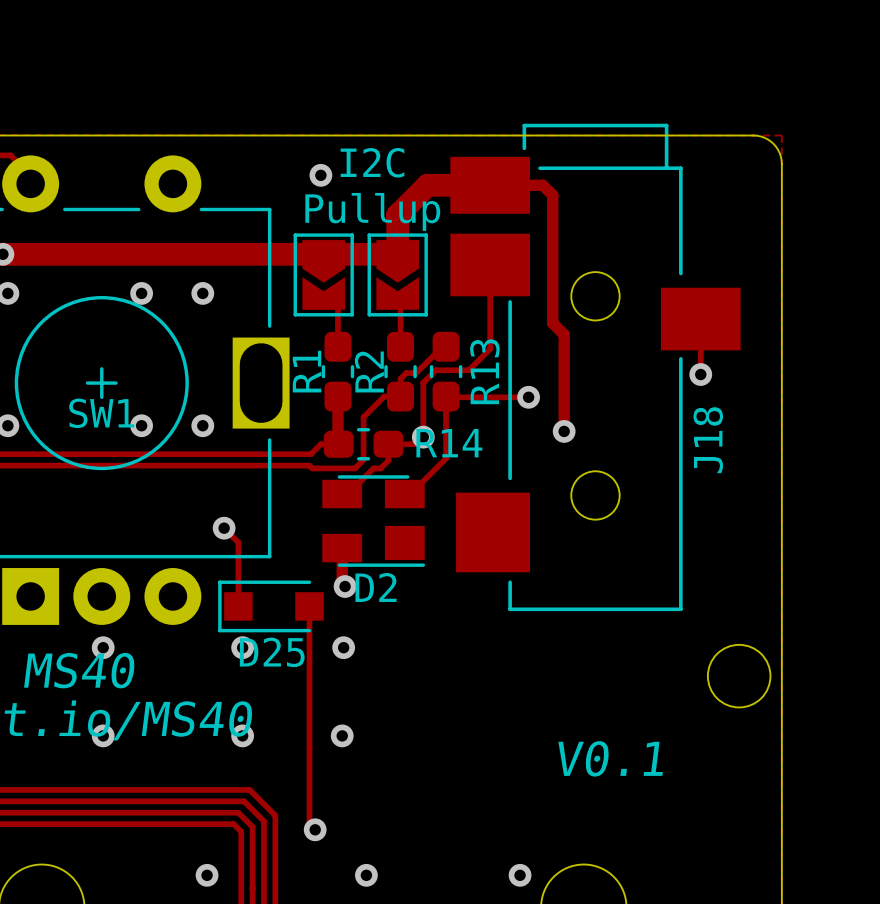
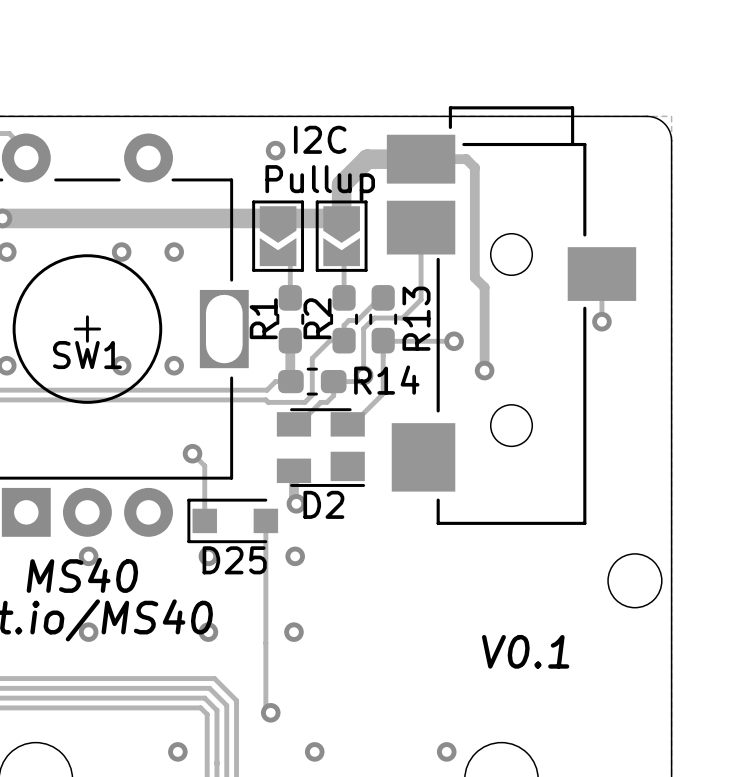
J18 name: J18 (708, 440) -> none

